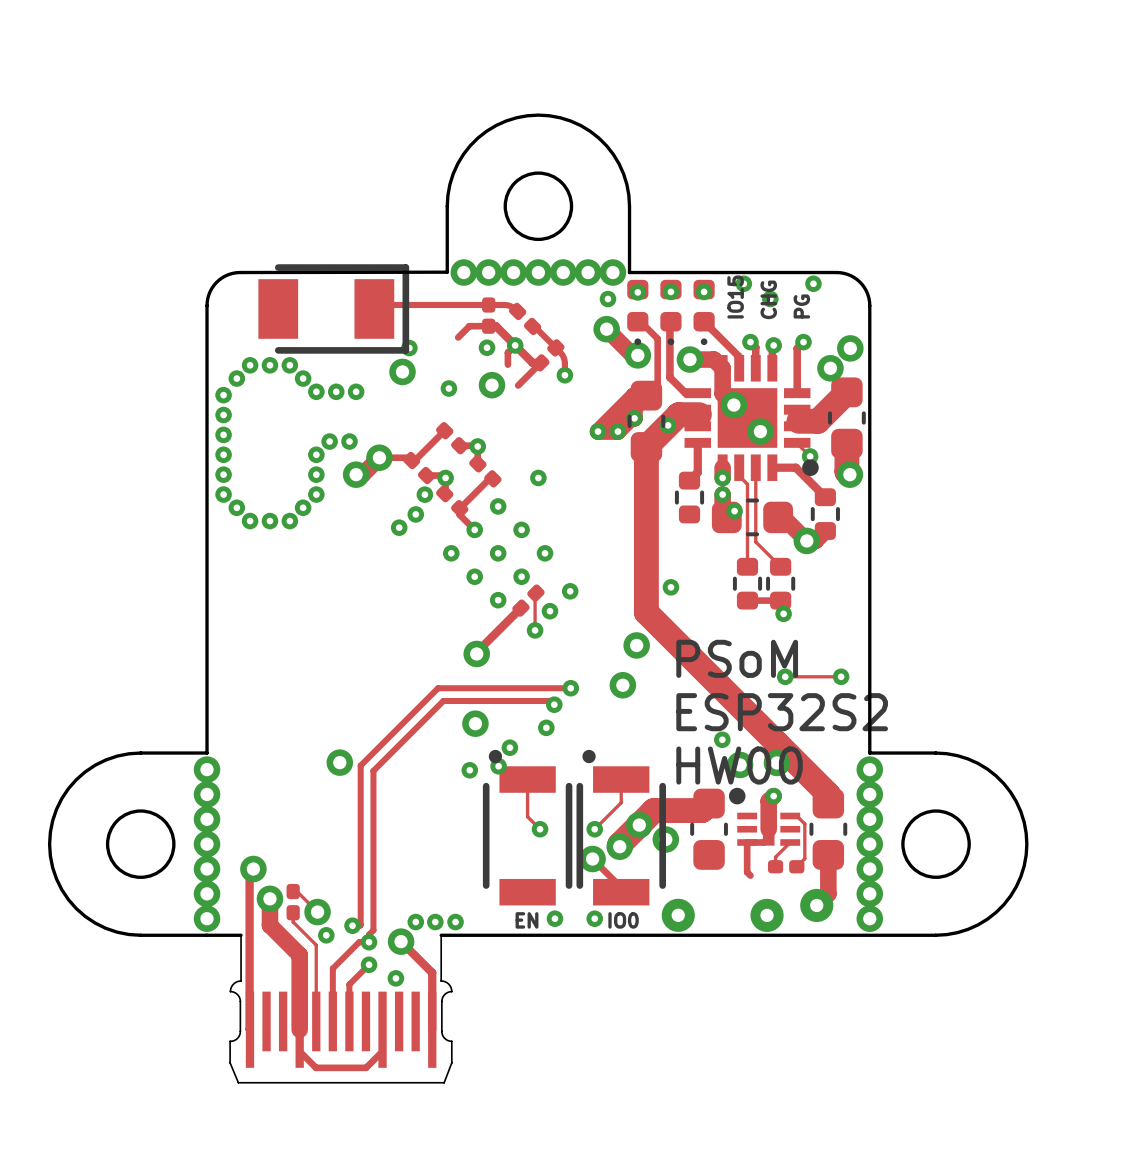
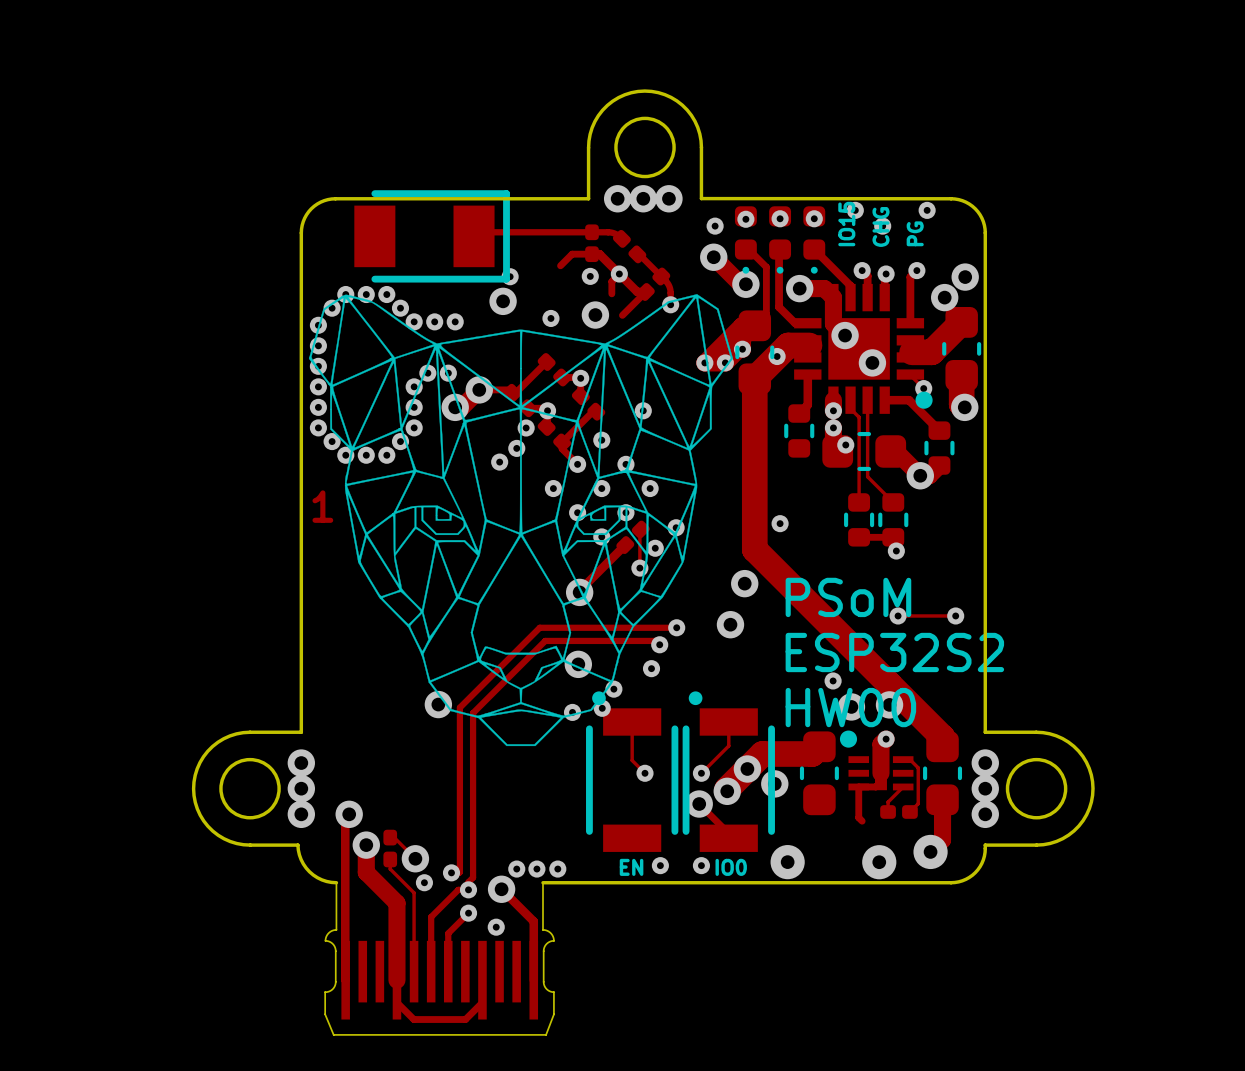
round board edge size: [503, 171, 574, 242] -> [614, 116, 676, 179]
board edge: (240, 272) (447, 272) (447, 195) (457, 163) (477, 138) (496, 125) (516, 117) (538, 115) (570, 121) (590, 131) (606, 145) (619, 163) (628, 195) (629, 272) (836, 272) -> (335, 198) (588, 198) (588, 140) (594, 121) (602, 110) (618, 97) (631, 92) (644, 91) (658, 92) (671, 97) (687, 109) (694, 121) (701, 140) (701, 198) (951, 198)
via: (463, 272) -> none
via: (488, 272) -> none
via: (588, 272) -> none
via: (612, 272) -> none
drawing: none -> [308, 294, 734, 747]
text: none -> 1 (322, 506)
board edge: (207, 753) (128, 753) (117, 756) (95, 765) (76, 779) (61, 798) (52, 820) (49, 844) (50, 856) (56, 879) (68, 899) (85, 916) (105, 928) (117, 932) (140, 935) (241, 935) -> (301, 694) (301, 732) (243, 732) (223, 738) (212, 746) (200, 762) (193, 782) (194, 795) (200, 815) (207, 826) (218, 835) (230, 841) (243, 844) (297, 845) (301, 859) (309, 871) (321, 879) (336, 882)
board edge: (869, 753) (946, 753) (968, 758) (987, 769) (1003, 783) (1016, 801) (1024, 822) (1026, 855) (1016, 886) (1003, 904) (987, 919) (968, 929) (935, 935) (836, 935) -> (985, 694) (985, 732) (1049, 733) (1068, 742) (1078, 751) (1086, 762) (1091, 774) (1093, 788) (1091, 802) (1086, 814) (1078, 826) (1062, 838) (1043, 844) (985, 845) (983, 859) (975, 872) (962, 880) (951, 882)
via: (207, 769) -> none
via: (869, 769) -> none
via: (207, 794) -> none
via: (869, 794) -> none
round board edge size: [105, 809, 176, 879] -> [219, 757, 281, 820]
round board edge size: [901, 809, 971, 879] -> [1005, 757, 1068, 820]
via: (207, 893) -> none
via: (869, 893) -> none
via: (207, 918) -> none
via: (869, 918) -> none

